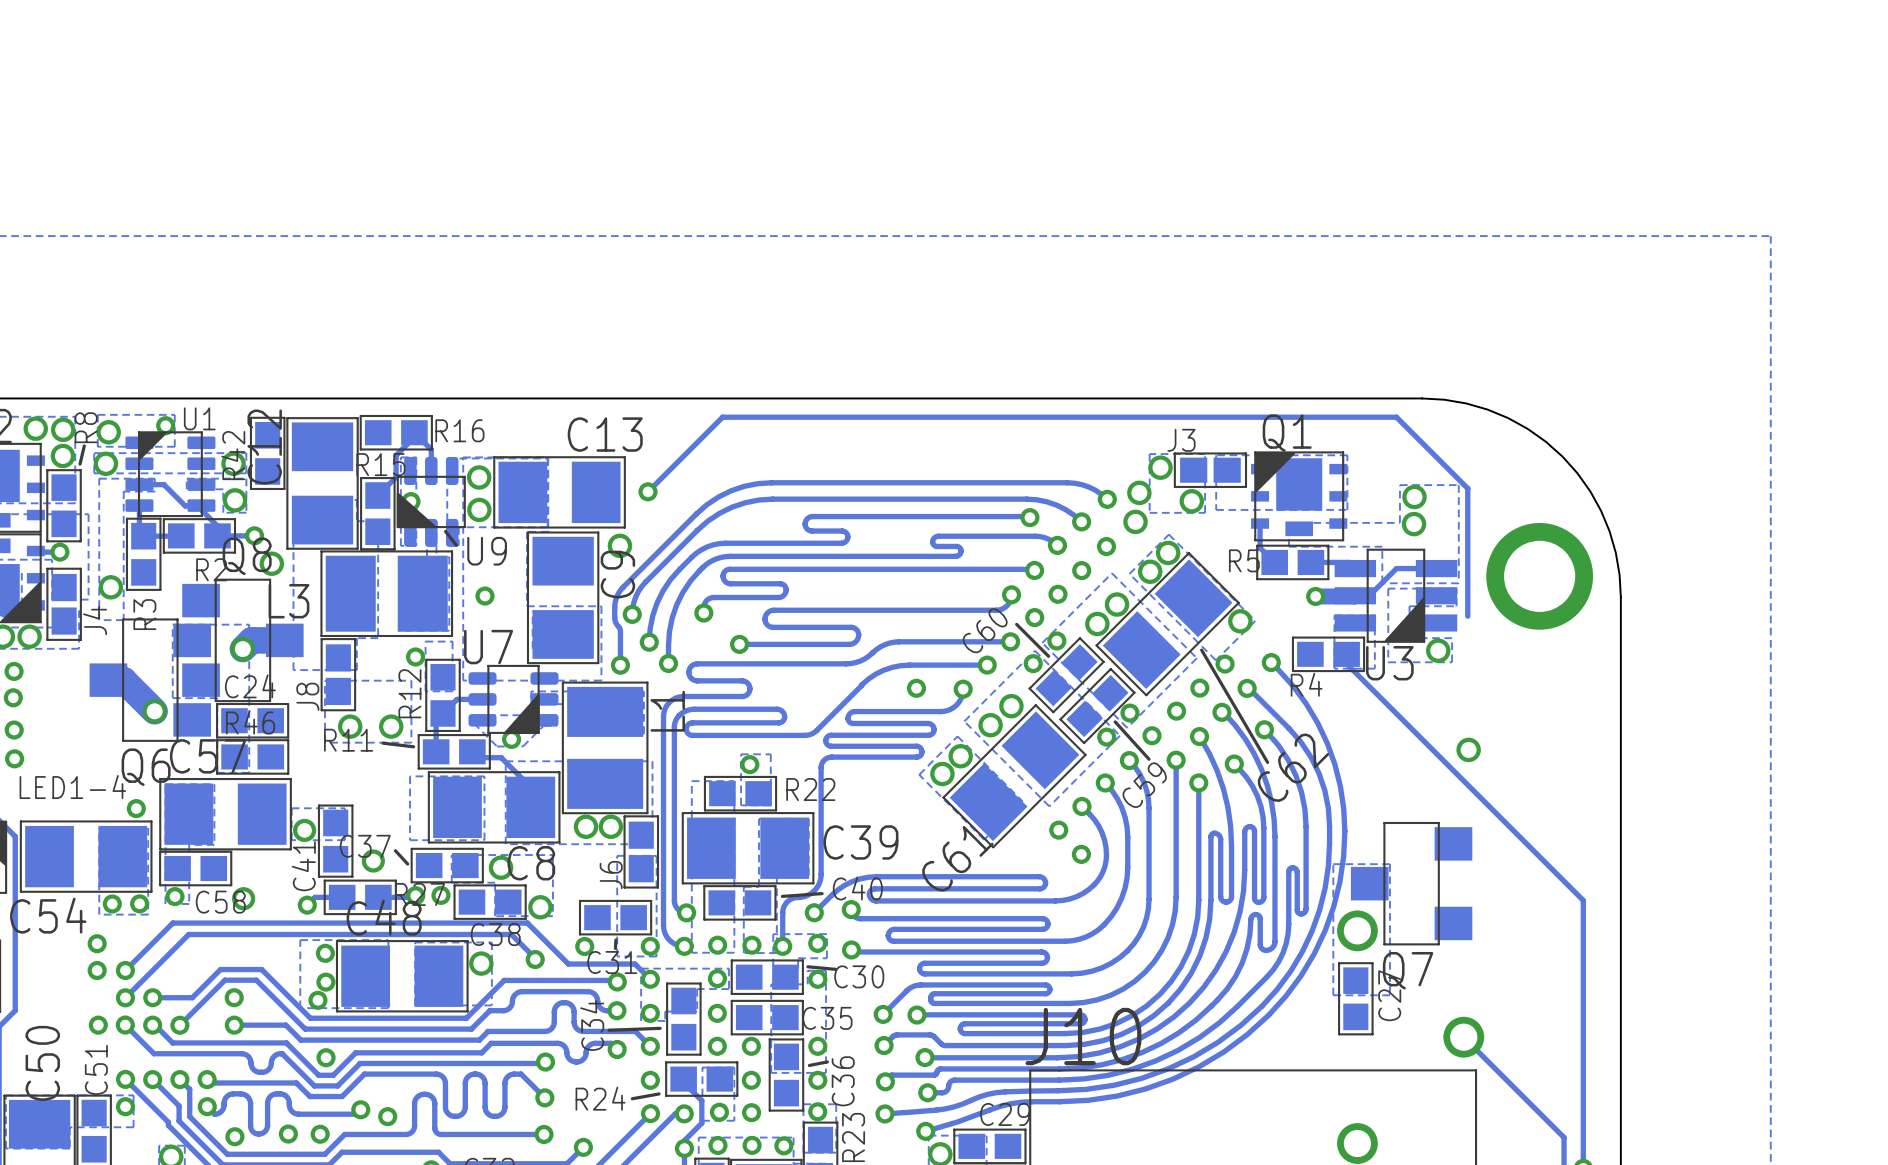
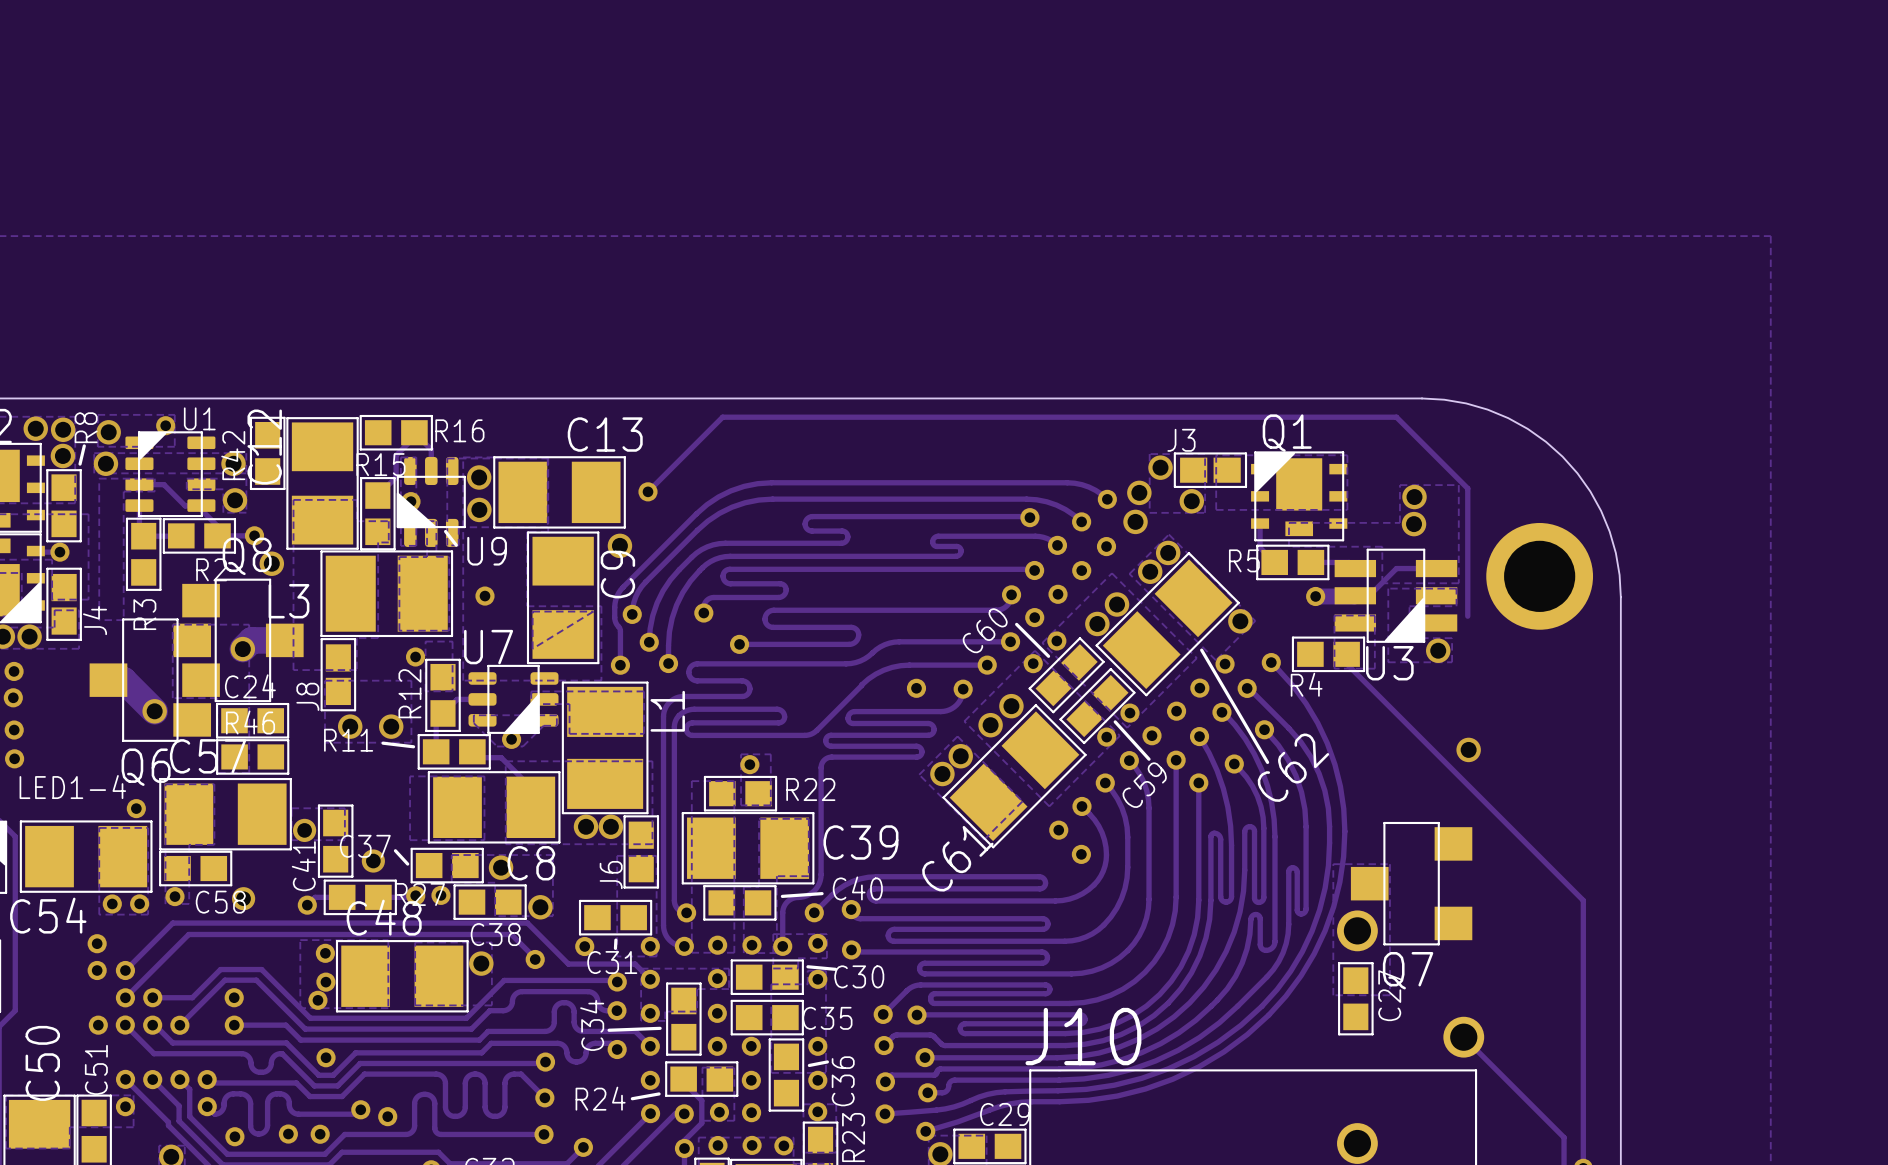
via: (110, 587) -> none

